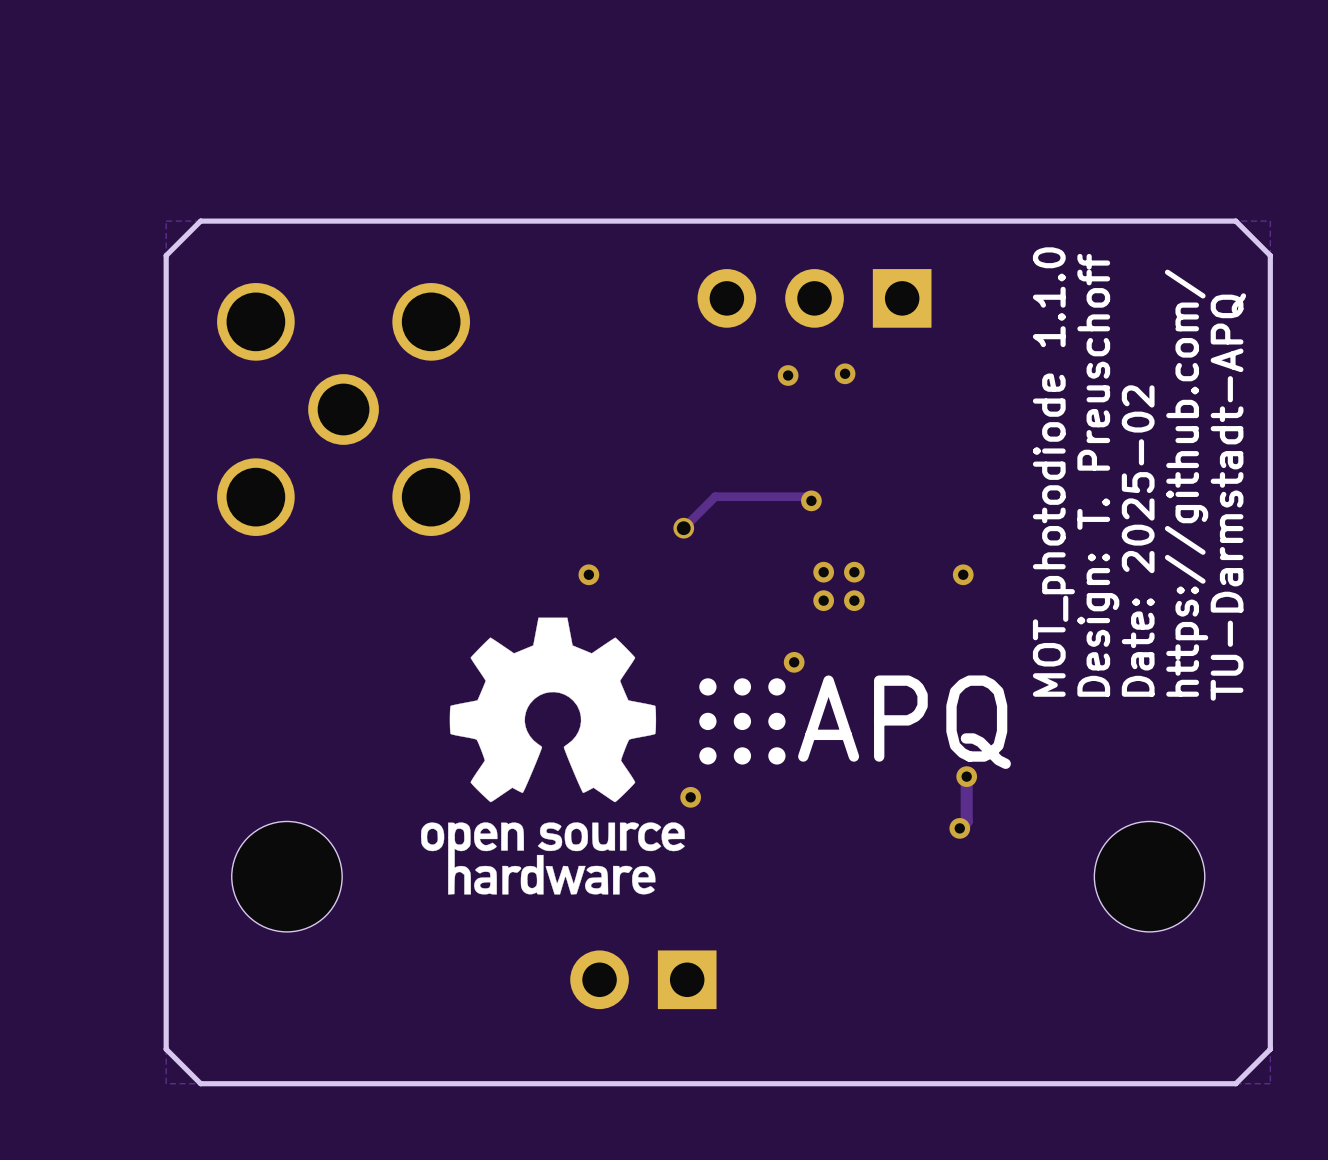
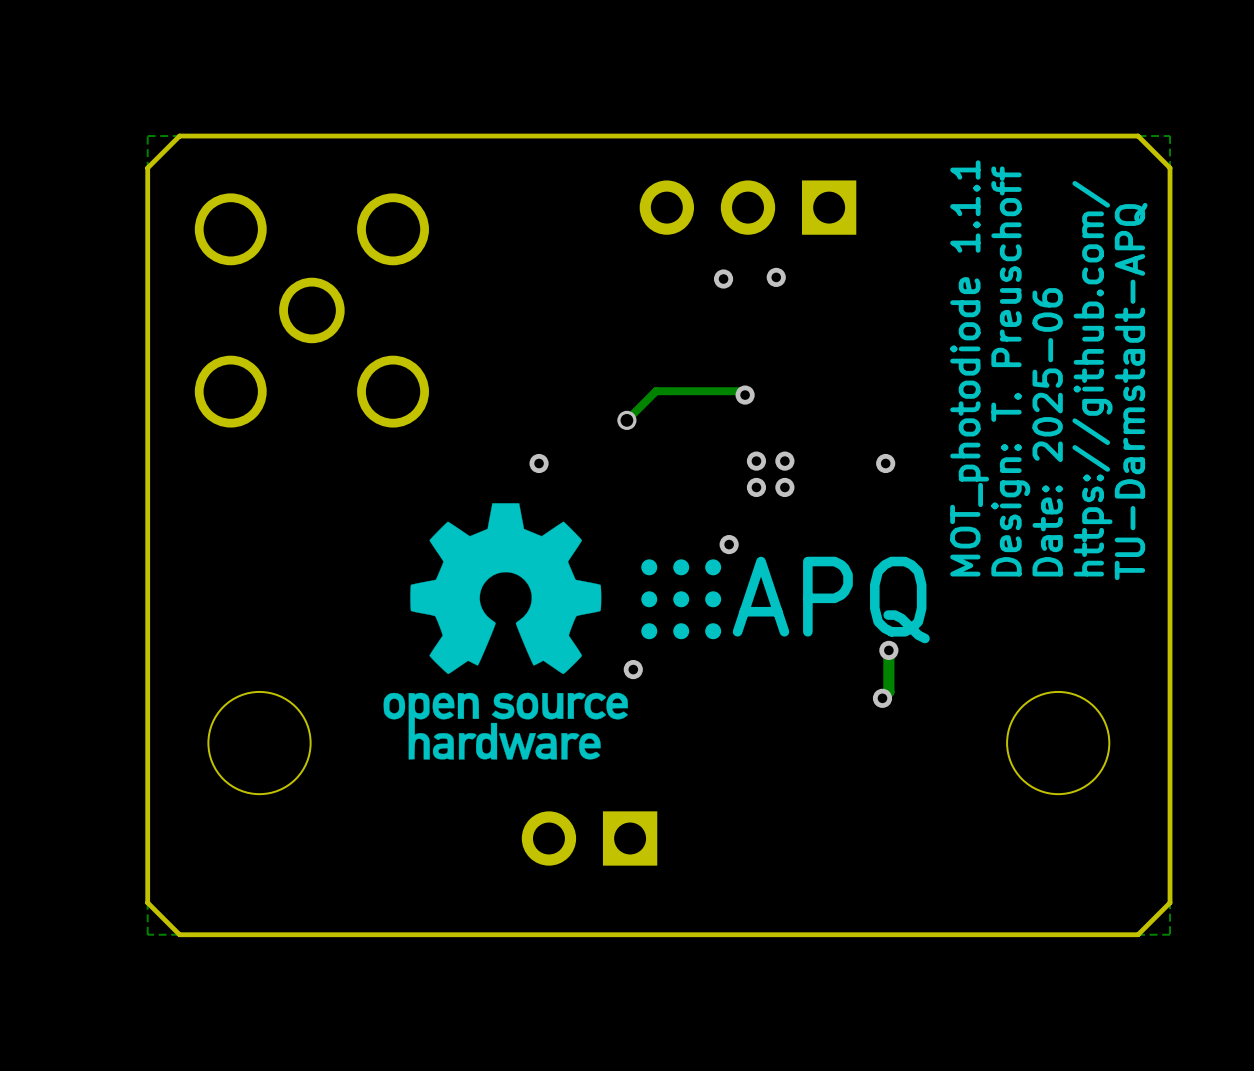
text: MOT_photodiode 1.1.0 (1053, 472) -> MOT_photodiode 1.1.1 (969, 368)
text: Date: 2025-02 (1138, 541) -> Date: 2025-06 (1047, 432)

